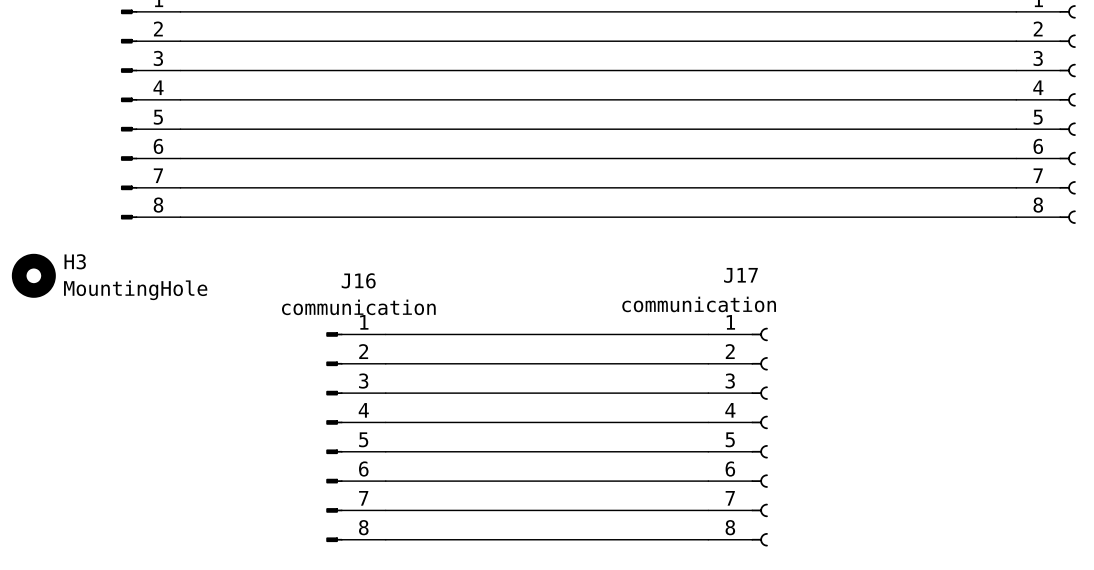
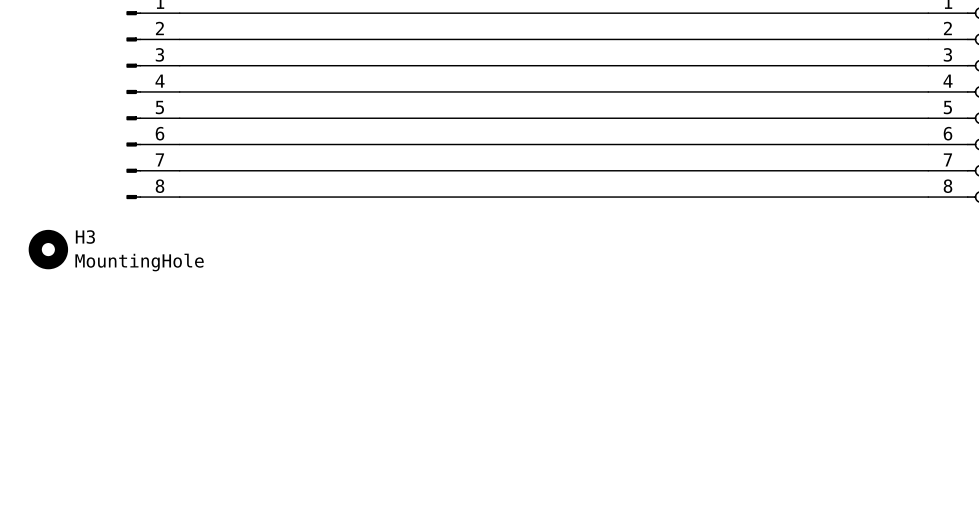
wire: (385, 334) (708, 334) -> none
wire: (385, 363) (708, 363) -> none
wire: (385, 393) (708, 393) -> none
wire: (385, 422) (708, 422) -> none
J16: communication (356, 437) -> none
J17: communication (738, 437) -> none
wire: (385, 451) (708, 451) -> none
wire: (385, 481) (708, 481) -> none
wire: (385, 510) (708, 510) -> none
wire: (385, 539) (708, 539) -> none

